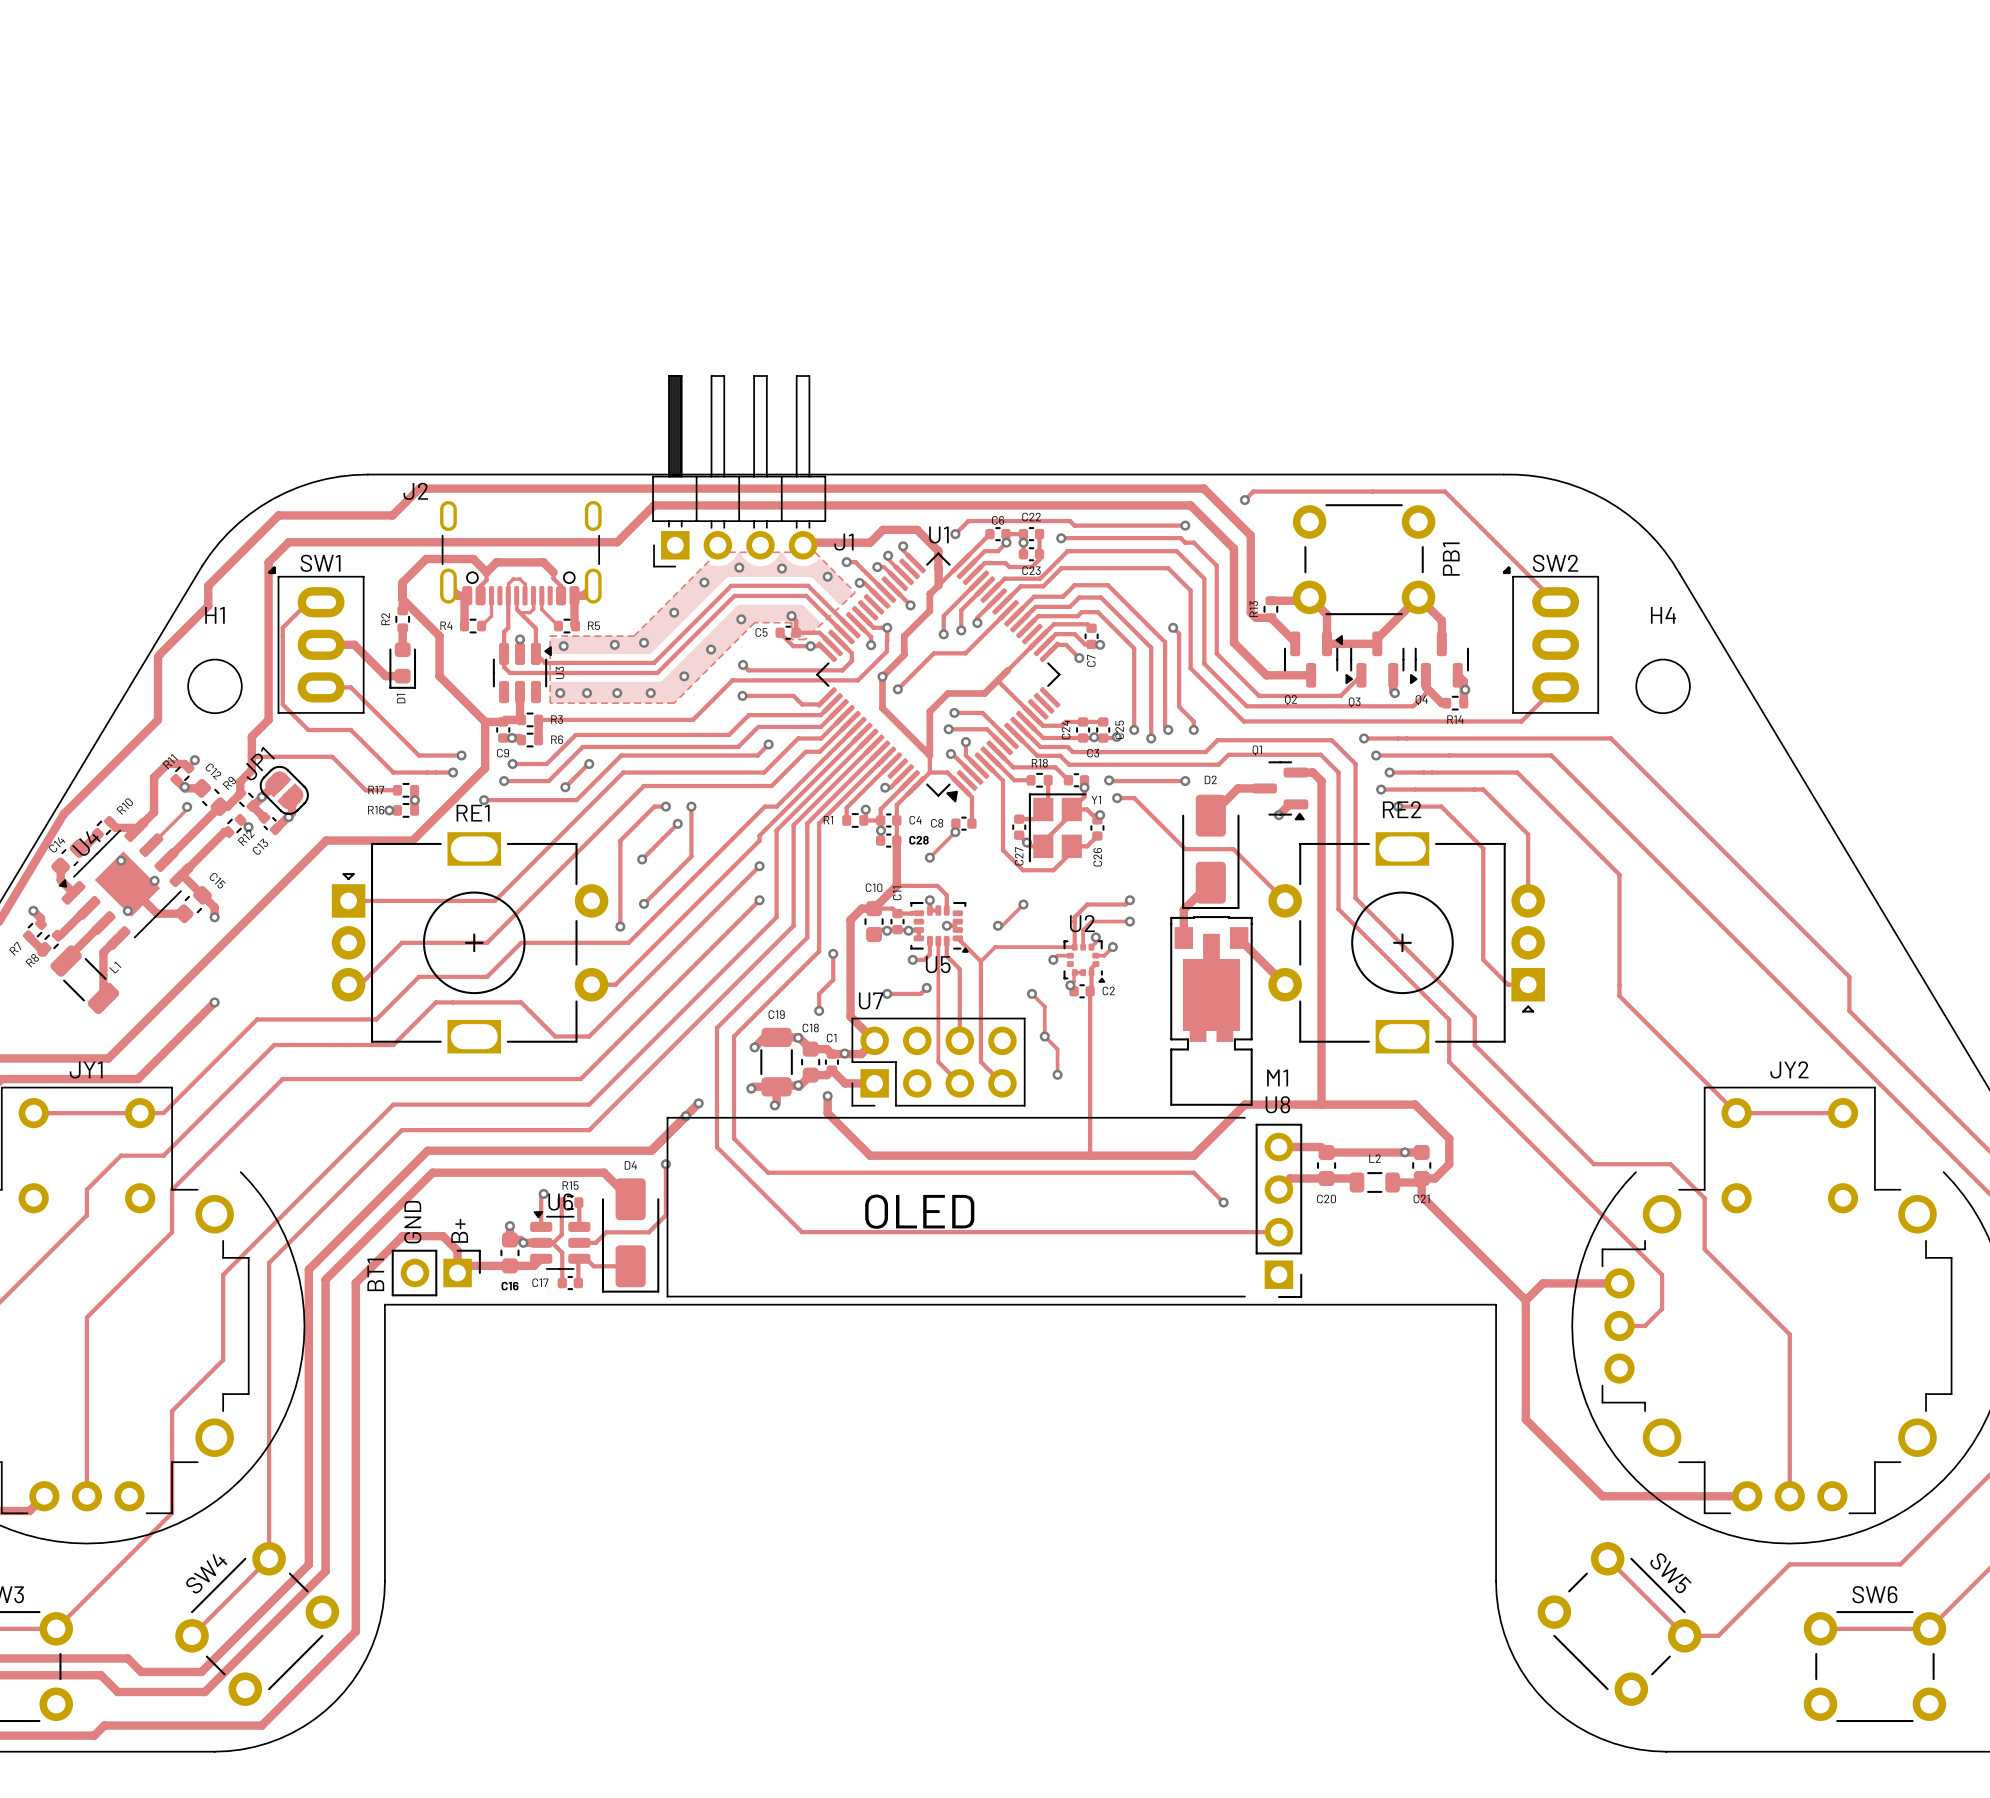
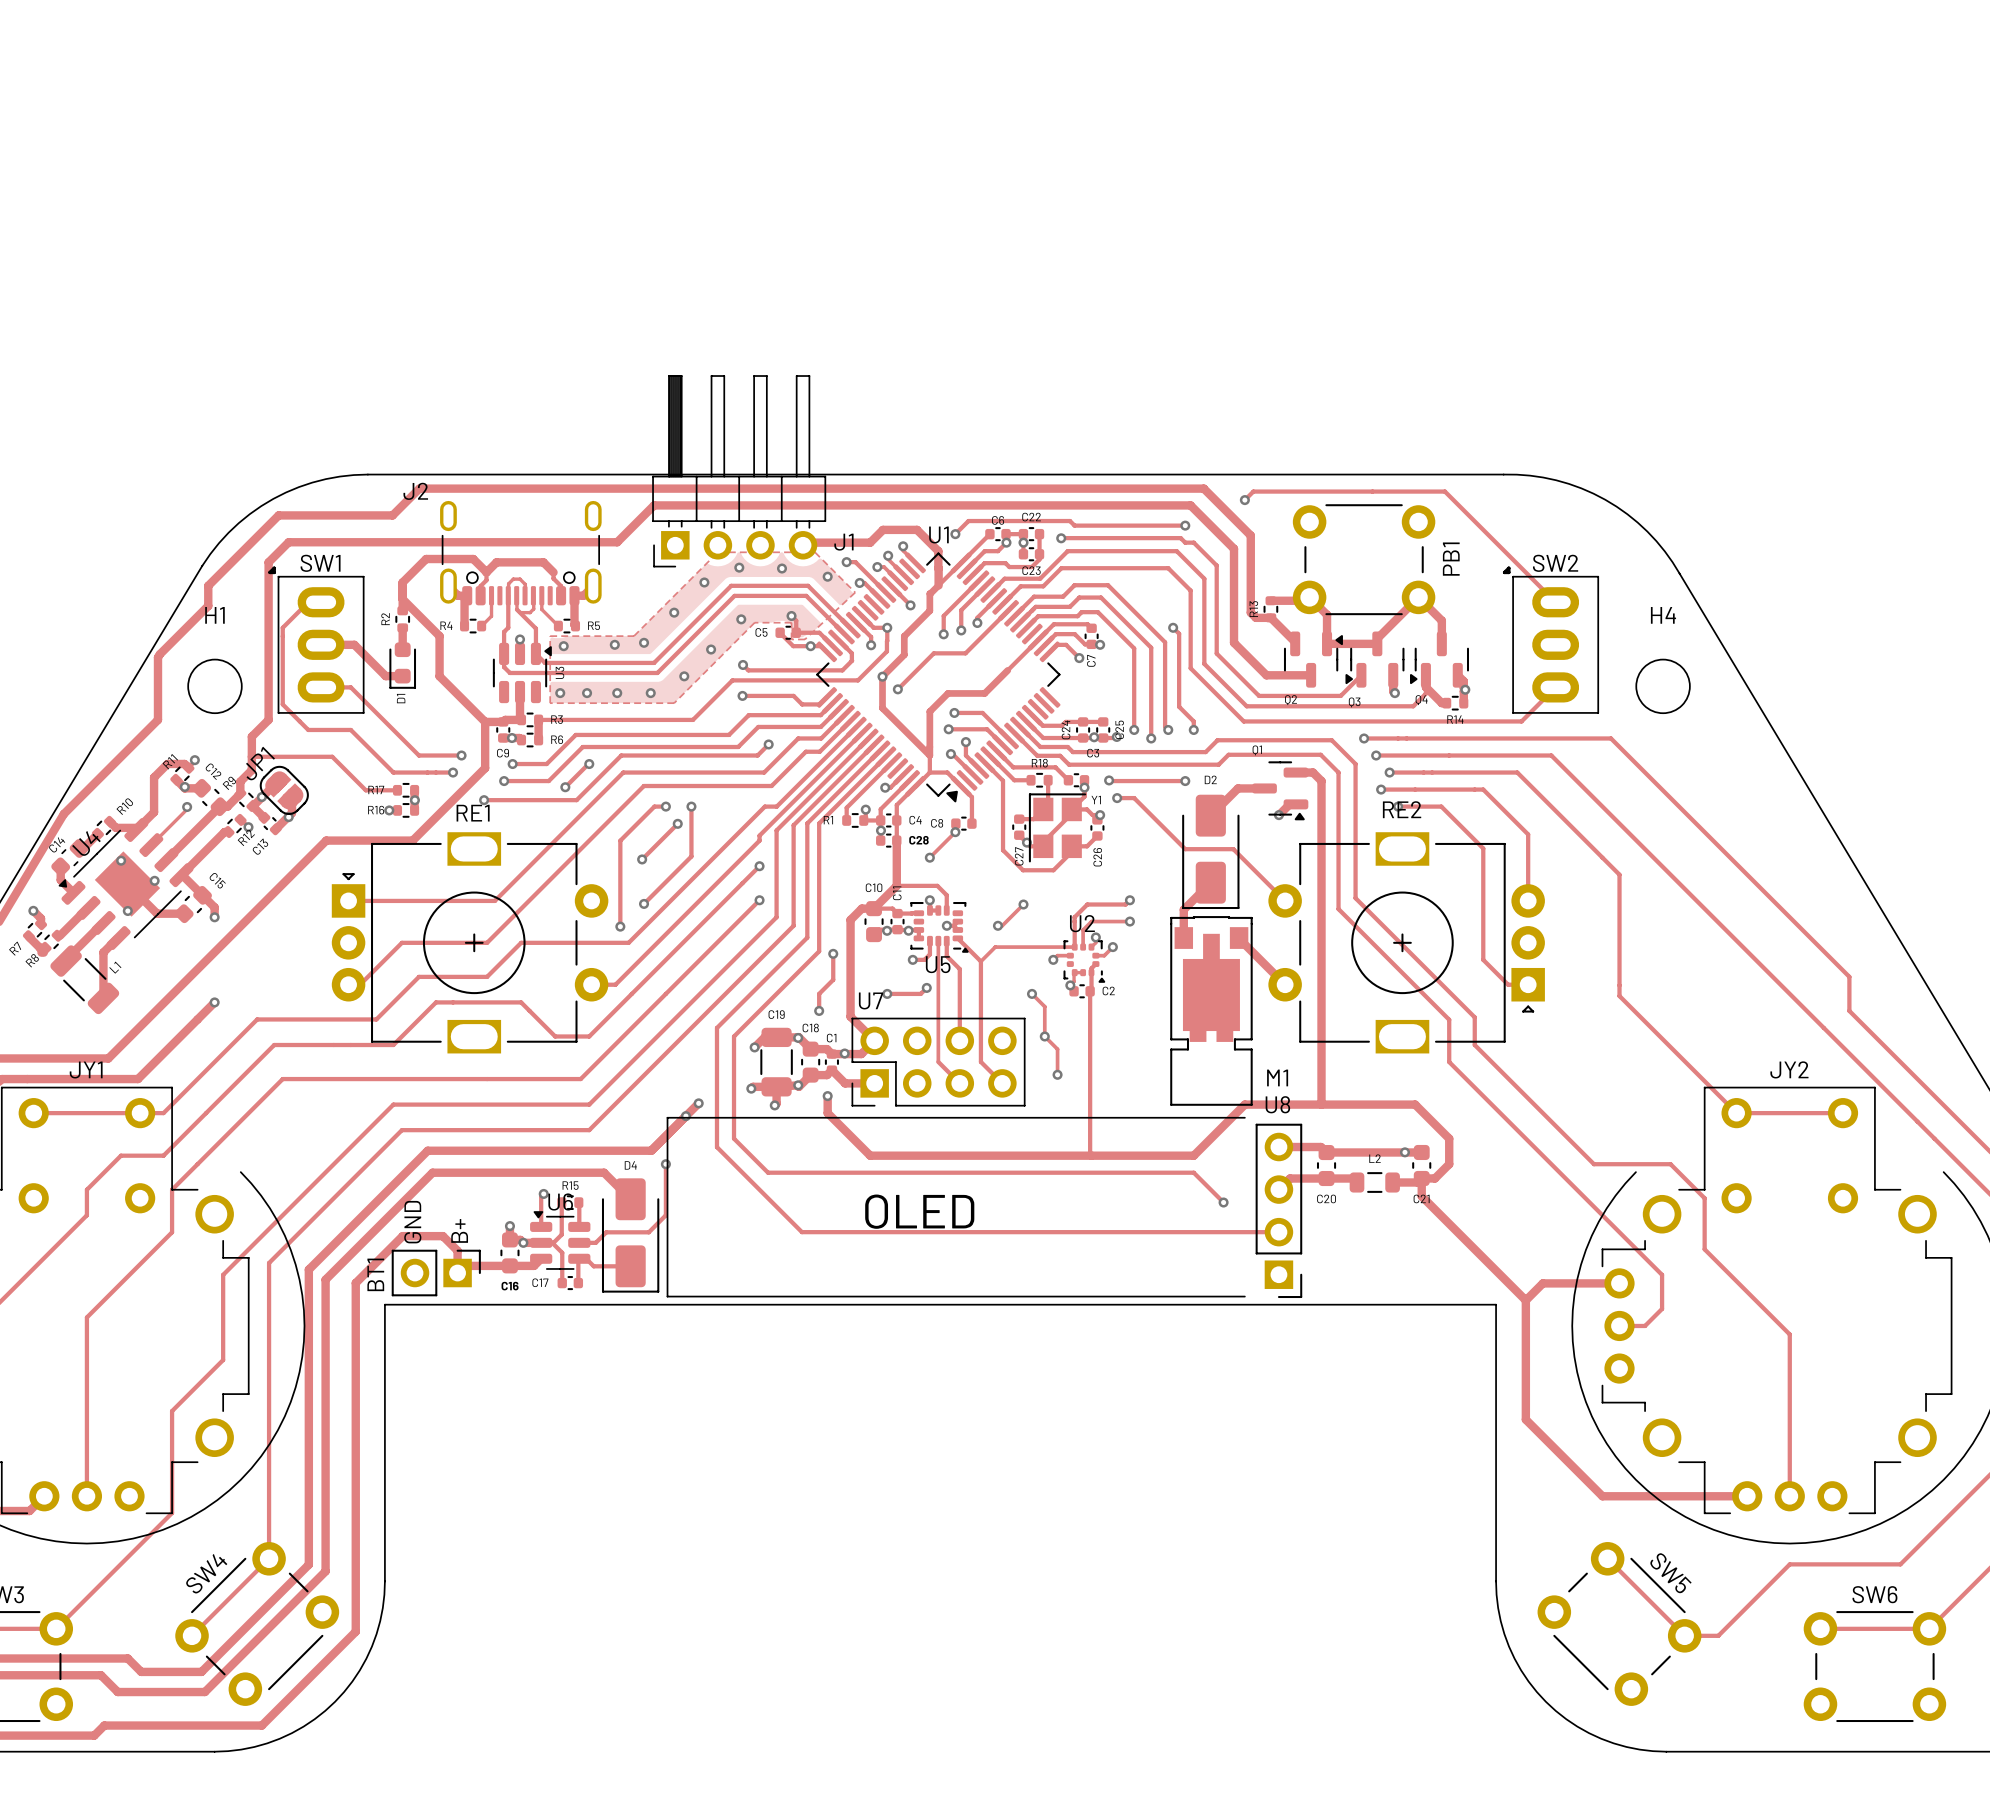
track: (998, 679) (1032, 715) -> none

